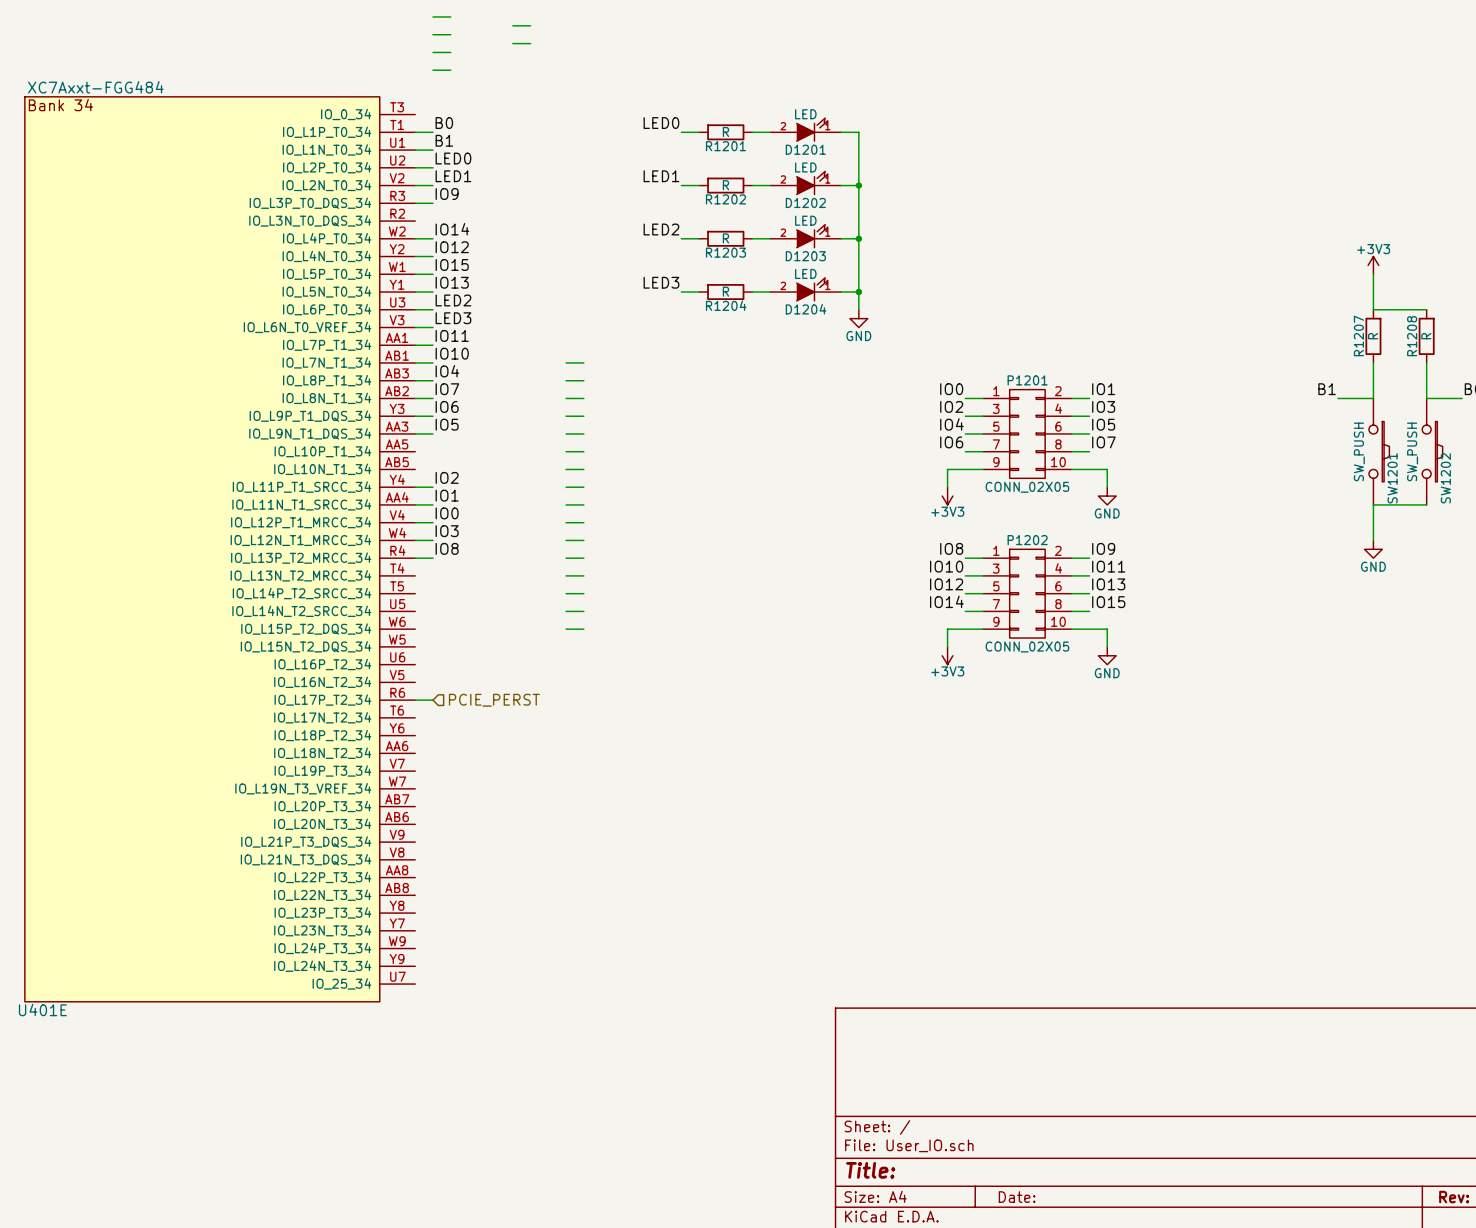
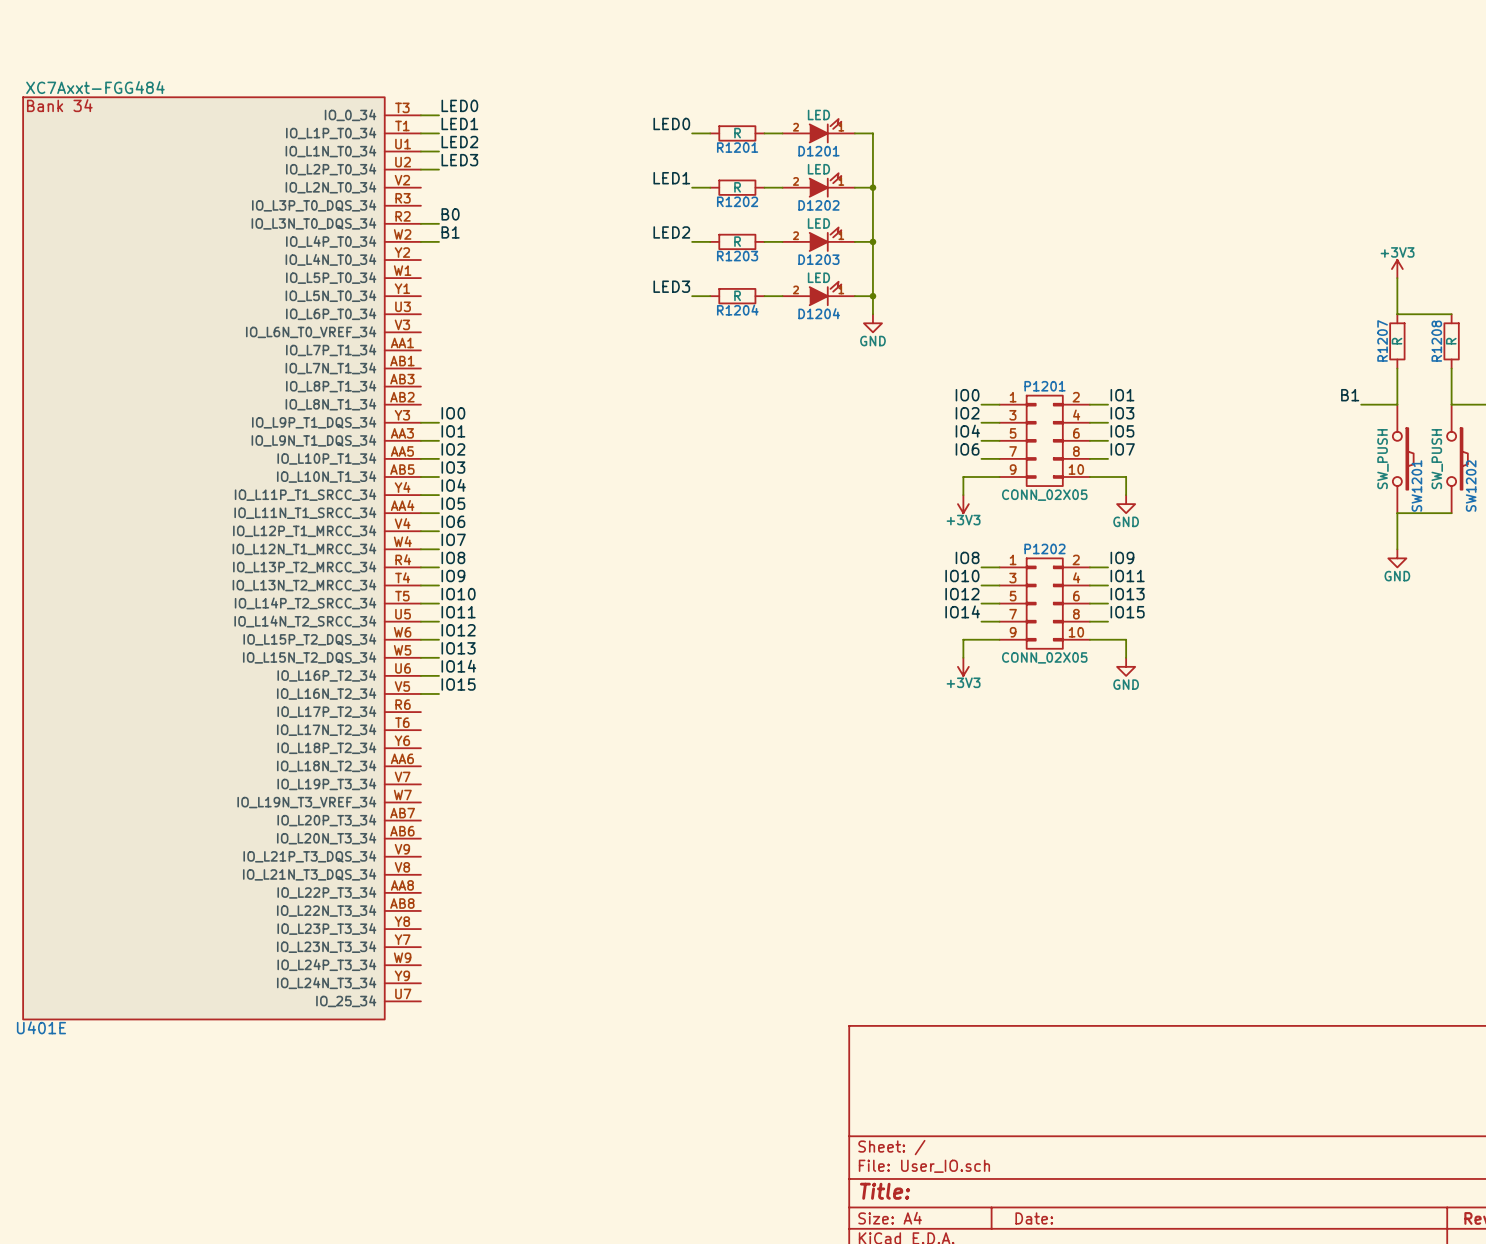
wire: (432, 16) (450, 16) -> none
wire: (512, 25) (530, 25) -> none
wire: (432, 34) (450, 34) -> none
wire: (512, 43) (530, 43) -> none
wire: (432, 52) (450, 52) -> none
wire: (432, 70) (450, 70) -> none
label: none -> LED0 (459, 105)
label: B0 (444, 123) -> LED1 (459, 123)
label: B1 (444, 140) -> LED2 (459, 142)
label: LED0 (453, 158) -> LED3 (459, 160)
label: LED1 (453, 176) -> none
wire: (415, 185) (432, 185) -> (420, 115) (438, 115)
label: IO9 (447, 194) -> none
wire: (415, 203) (432, 203) -> none
label: none -> B0 (450, 214)
label: IO14 (452, 229) -> B1 (450, 232)
label: IO12 (452, 247) -> none
wire: (415, 256) (432, 256) -> none
label: IO15 (452, 264) -> none
wire: (415, 274) (432, 274) -> none
label: IO13 (452, 282) -> none
wire: (415, 292) (432, 292) -> (420, 223) (438, 223)
label: LED2 (453, 300) -> none
wire: (415, 309) (432, 309) -> none
label: LED3 (453, 318) -> none
wire: (415, 327) (432, 327) -> none
label: IO11 (452, 335) -> none
wire: (415, 345) (432, 345) -> none
label: IO10 (452, 353) -> none
wire: (415, 362) (432, 362) -> none
wire: (566, 362) (583, 362) -> none
label: IO4 (447, 371) -> none
wire: (415, 380) (432, 380) -> none
wire: (566, 380) (583, 380) -> none
label: IO7 (447, 389) -> none
wire: (415, 398) (432, 398) -> none
wire: (566, 398) (583, 398) -> (420, 458) (438, 458)
label: IO6 (447, 406) -> IO0 (453, 413)
wire: (566, 416) (583, 416) -> (420, 476) (438, 476)
label: IO5 (447, 424) -> IO1 (453, 431)
wire: (566, 433) (583, 433) -> none
label: none -> IO2 (453, 449)
wire: (566, 451) (583, 451) -> none
label: none -> IO3 (453, 467)
wire: (566, 469) (583, 469) -> none
label: IO2 (447, 477) -> IO4 (453, 485)
wire: (566, 487) (583, 487) -> none
label: IO1 (447, 495) -> IO5 (453, 503)
wire: (566, 504) (583, 504) -> none
label: IO0 (447, 513) -> IO6 (453, 521)
wire: (566, 522) (583, 522) -> (420, 585) (438, 585)
label: IO3 (447, 531) -> IO7 (453, 539)
wire: (566, 540) (583, 540) -> (420, 603) (438, 603)
wire: (566, 558) (583, 558) -> (420, 621) (438, 621)
label: none -> IO9 (453, 576)
wire: (566, 575) (583, 575) -> (420, 639) (438, 639)
label: none -> IO10 (458, 594)
wire: (566, 593) (583, 593) -> (420, 657) (438, 657)
label: none -> IO11 (458, 612)
wire: (566, 611) (583, 611) -> (420, 675) (438, 675)
label: none -> IO12 (458, 630)
wire: (566, 629) (583, 629) -> (420, 693) (438, 693)
label: none -> IO13 (458, 648)
label: none -> IO14 (458, 666)
label: none -> IO15 (458, 684)
wire: (415, 700) (432, 700) -> none
hierarchical label: PCIE_PERST (494, 700) -> none

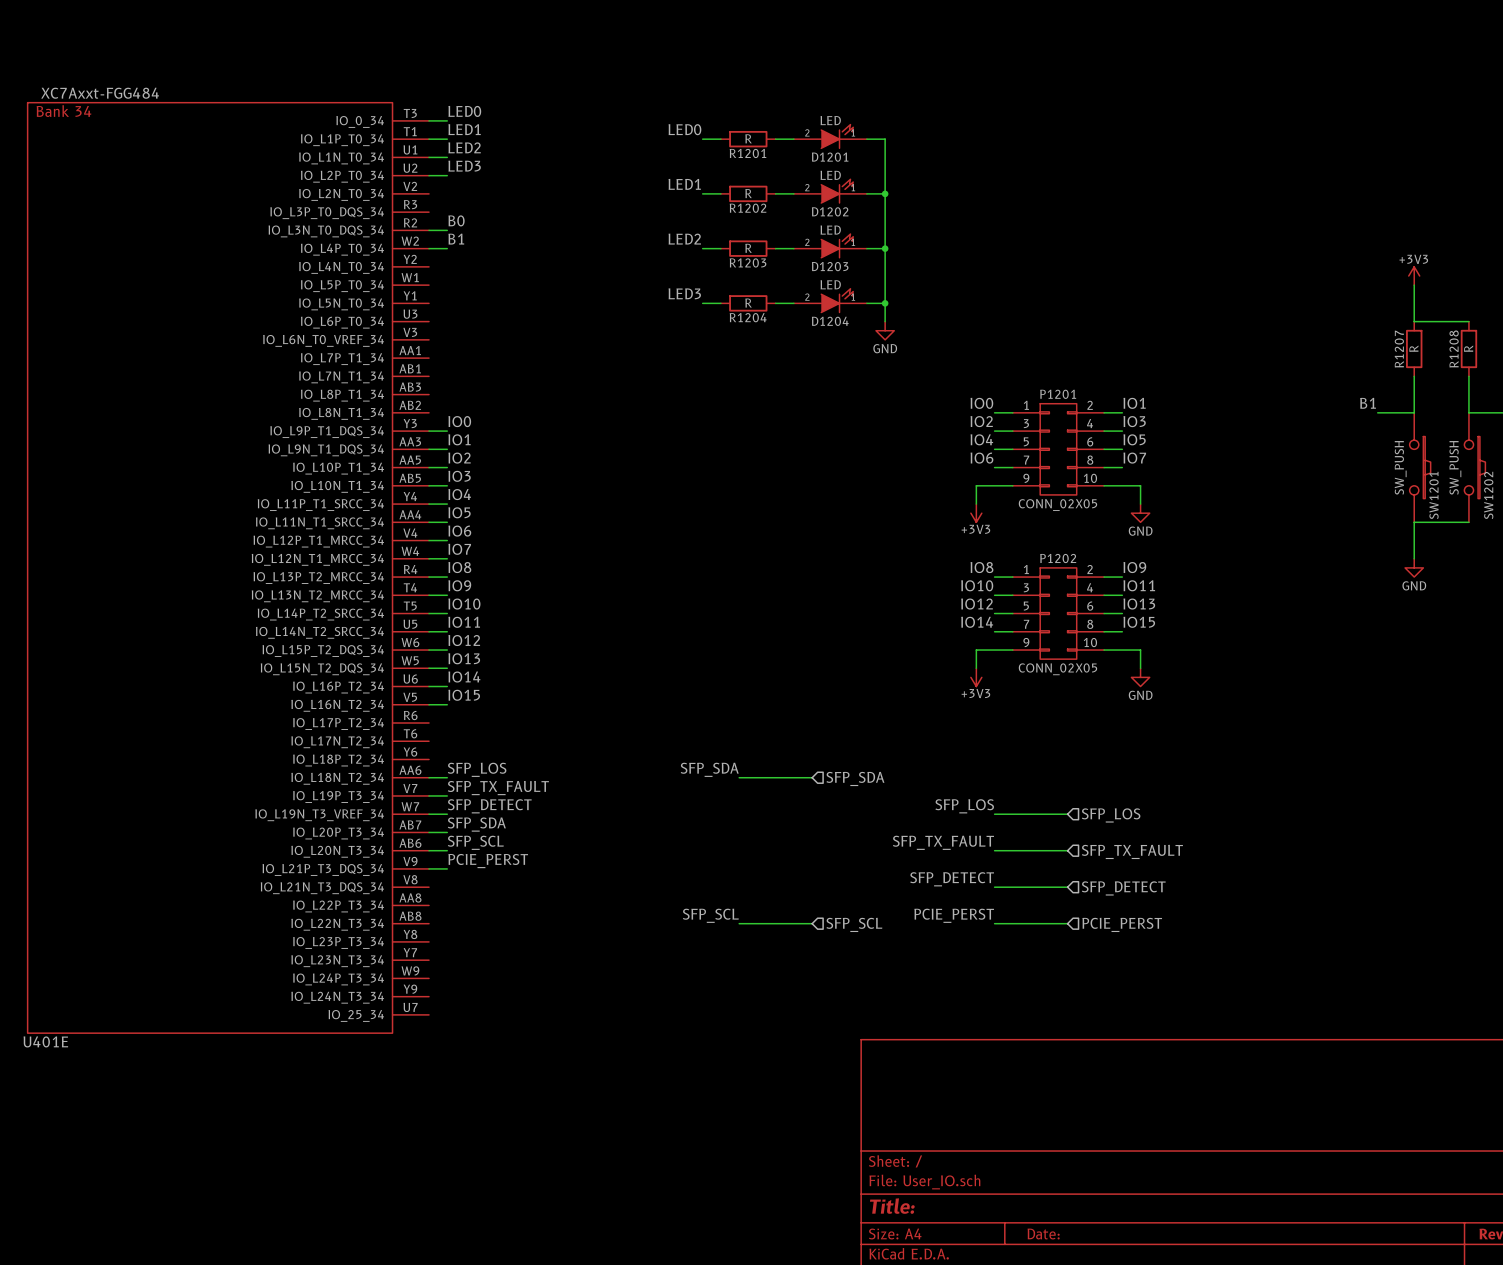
label: none -> SFP_LOS (477, 769)
label: none -> SFP_SDA (709, 769)
wire: none -> (429, 777) (447, 777)
wire: none -> (739, 777) (812, 777)
hierarchical label: none -> SFP_SDA (855, 778)
label: none -> SFP_TX_FAULT (498, 788)
wire: none -> (429, 795) (447, 795)
label: none -> SFP_DETECT (489, 806)
label: none -> SFP_LOS (964, 806)
wire: none -> (429, 814) (447, 814)
wire: none -> (994, 814) (1067, 814)
hierarchical label: none -> SFP_LOS (1111, 815)
label: none -> SFP_SDA (476, 824)
wire: none -> (429, 832) (447, 832)
label: none -> SFP_SCL (475, 842)
label: none -> SFP_TX_FAULT (943, 842)
wire: none -> (429, 850) (447, 850)
wire: none -> (994, 850) (1067, 850)
hierarchical label: none -> SFP_TX_FAULT (1132, 851)
label: none -> PCIE_PERST (488, 861)
wire: none -> (429, 868) (447, 868)
label: none -> SFP_DETECT (952, 879)
wire: none -> (994, 887) (1067, 887)
hierarchical label: none -> SFP_DETECT (1123, 888)
label: none -> SFP_SCL (710, 915)
label: none -> PCIE_PERST (954, 915)
wire: none -> (739, 923) (812, 923)
wire: none -> (994, 923) (1067, 923)
hierarchical label: none -> SFP_SCL (854, 924)
hierarchical label: none -> PCIE_PERST (1122, 924)

